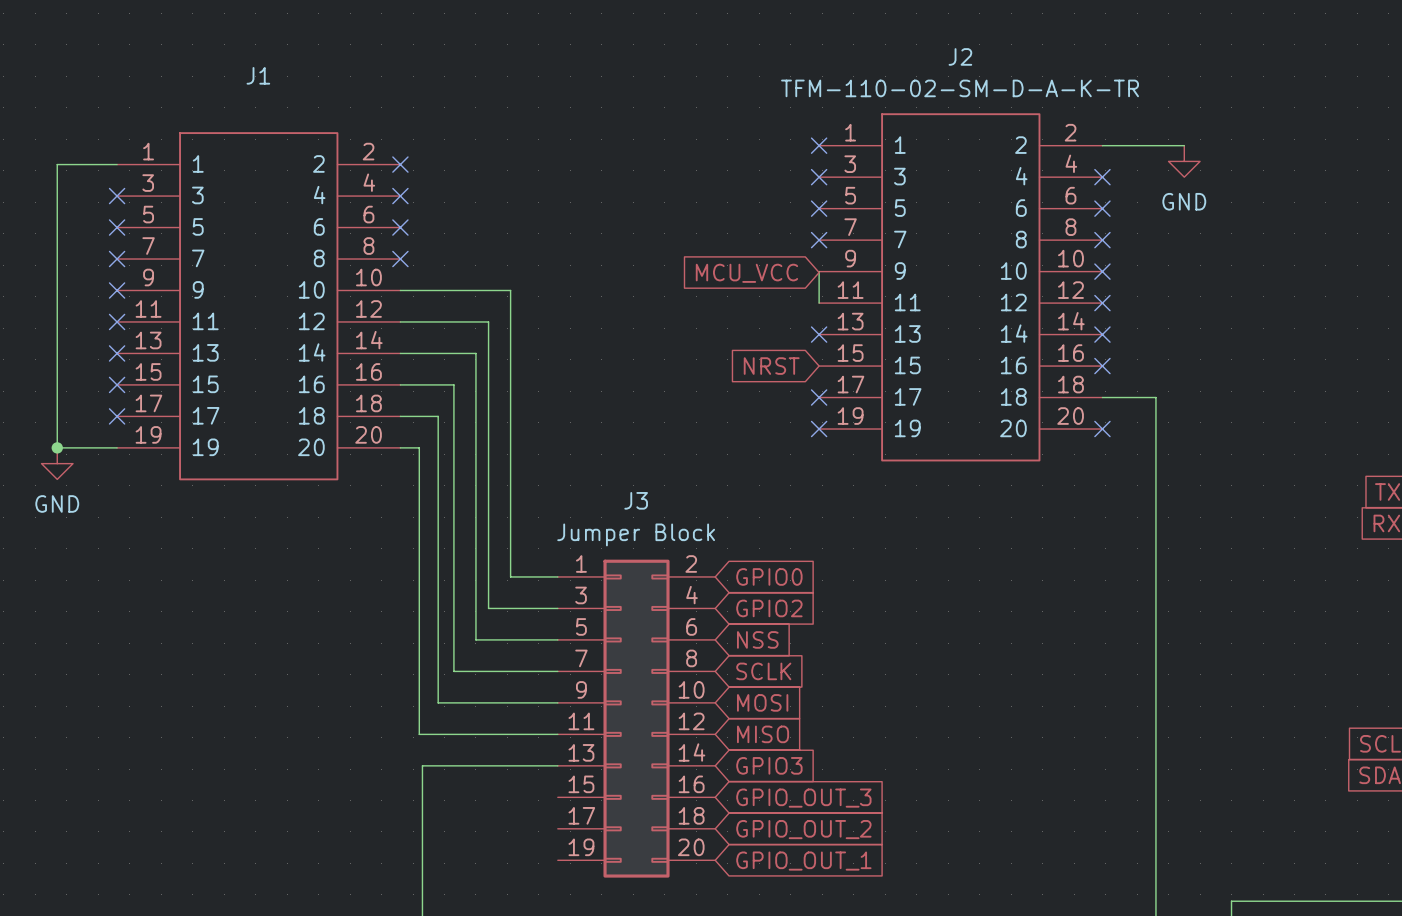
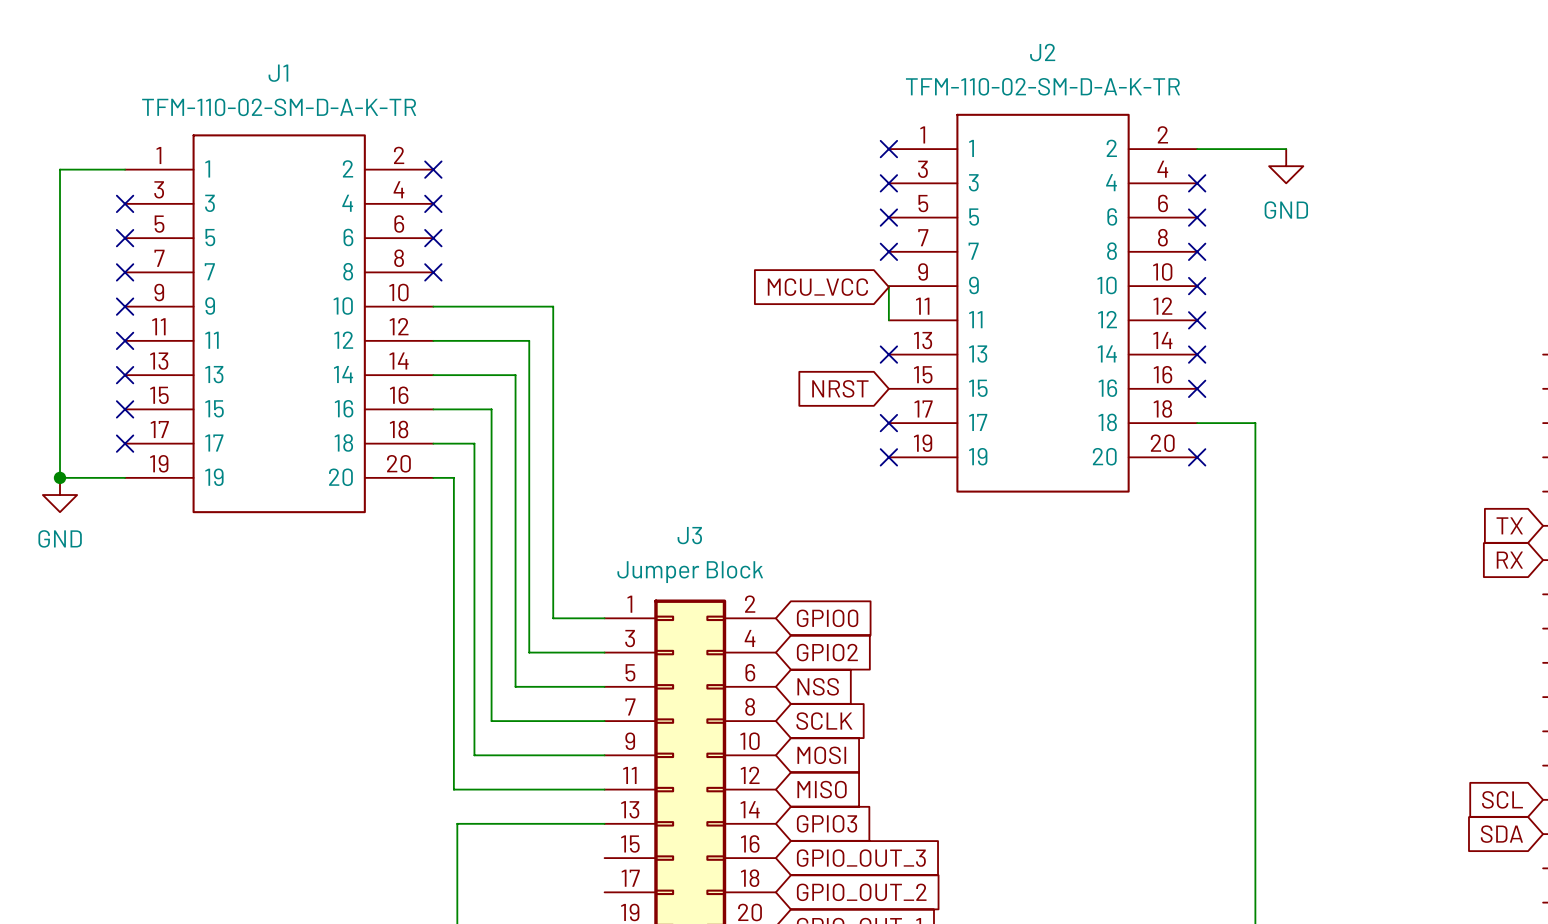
J1 value: none -> TFM-110-02-SM-D-A-K-TR (279, 107)

